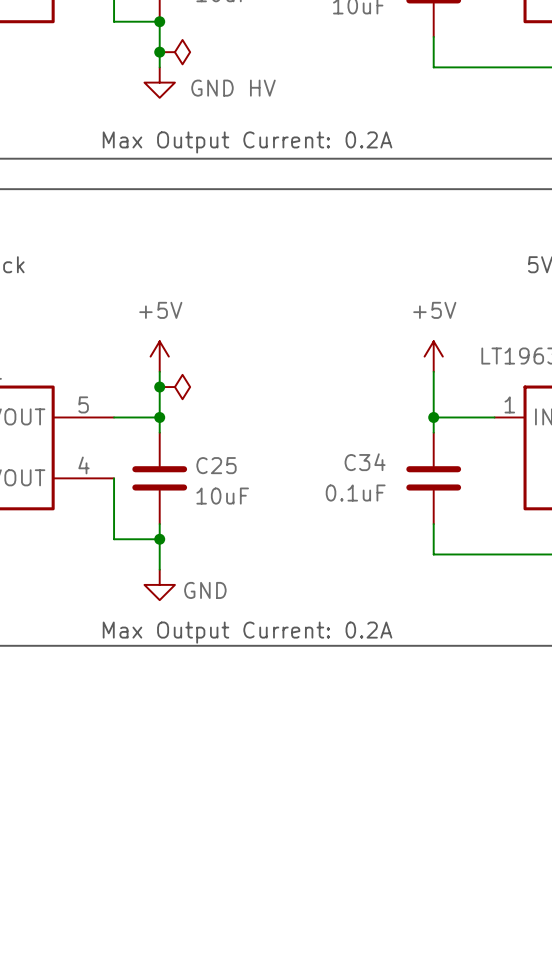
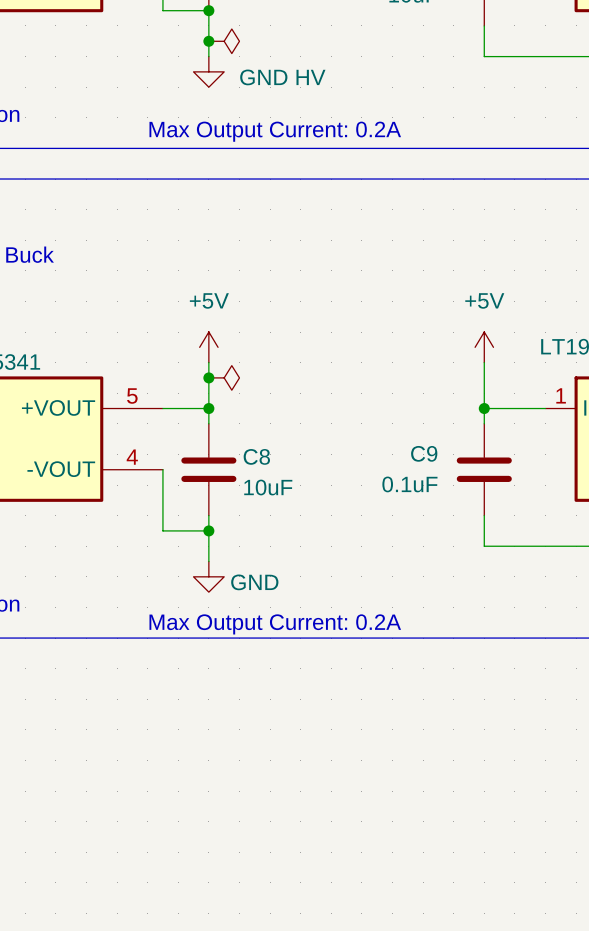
C34 name: C34 (365, 462) -> C9 (424, 453)
C25 name: C25 (216, 465) -> C8 (256, 456)

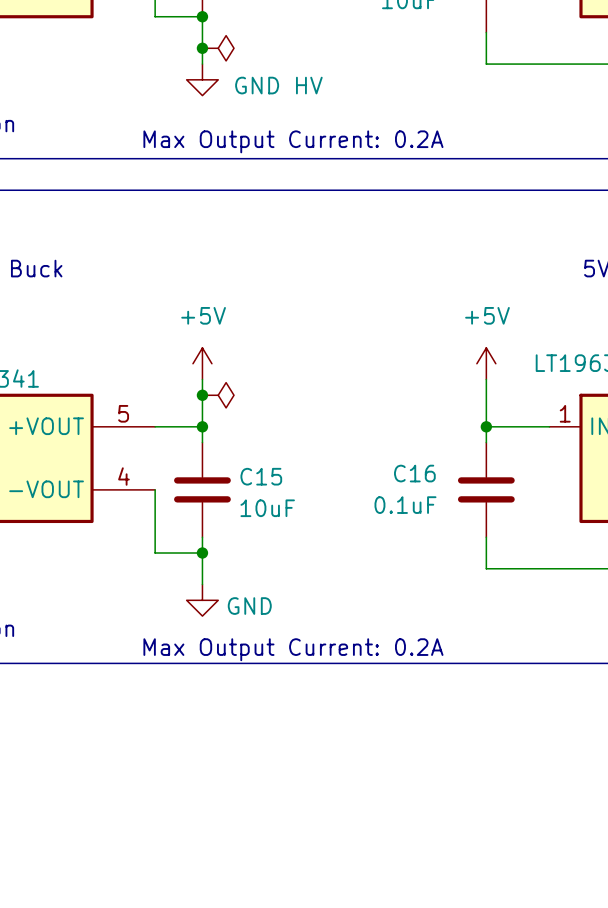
C9 name: C9 (424, 453) -> C16 (414, 473)
C8 name: C8 (256, 456) -> C15 (261, 476)

